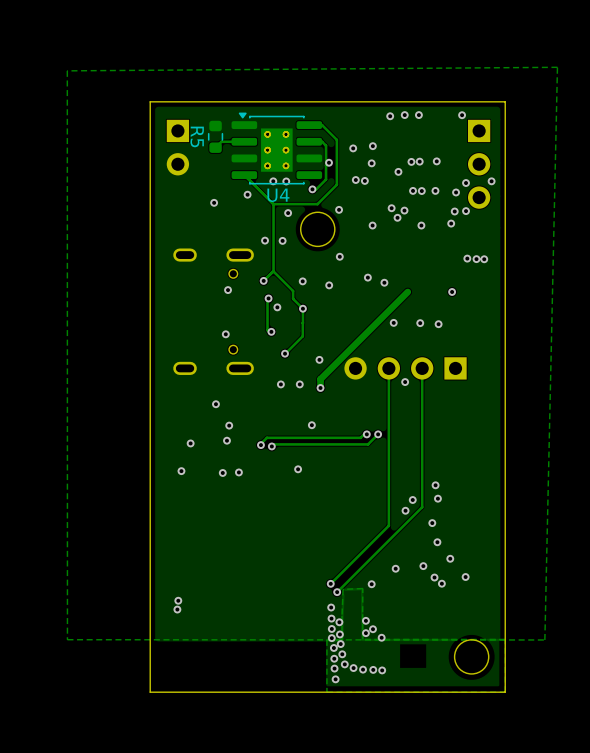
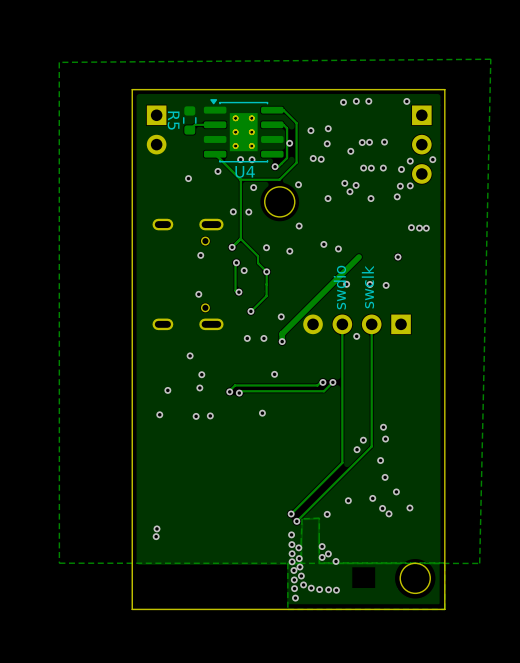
text: none -> swdio (339, 287)
text: none -> swclk (367, 287)

